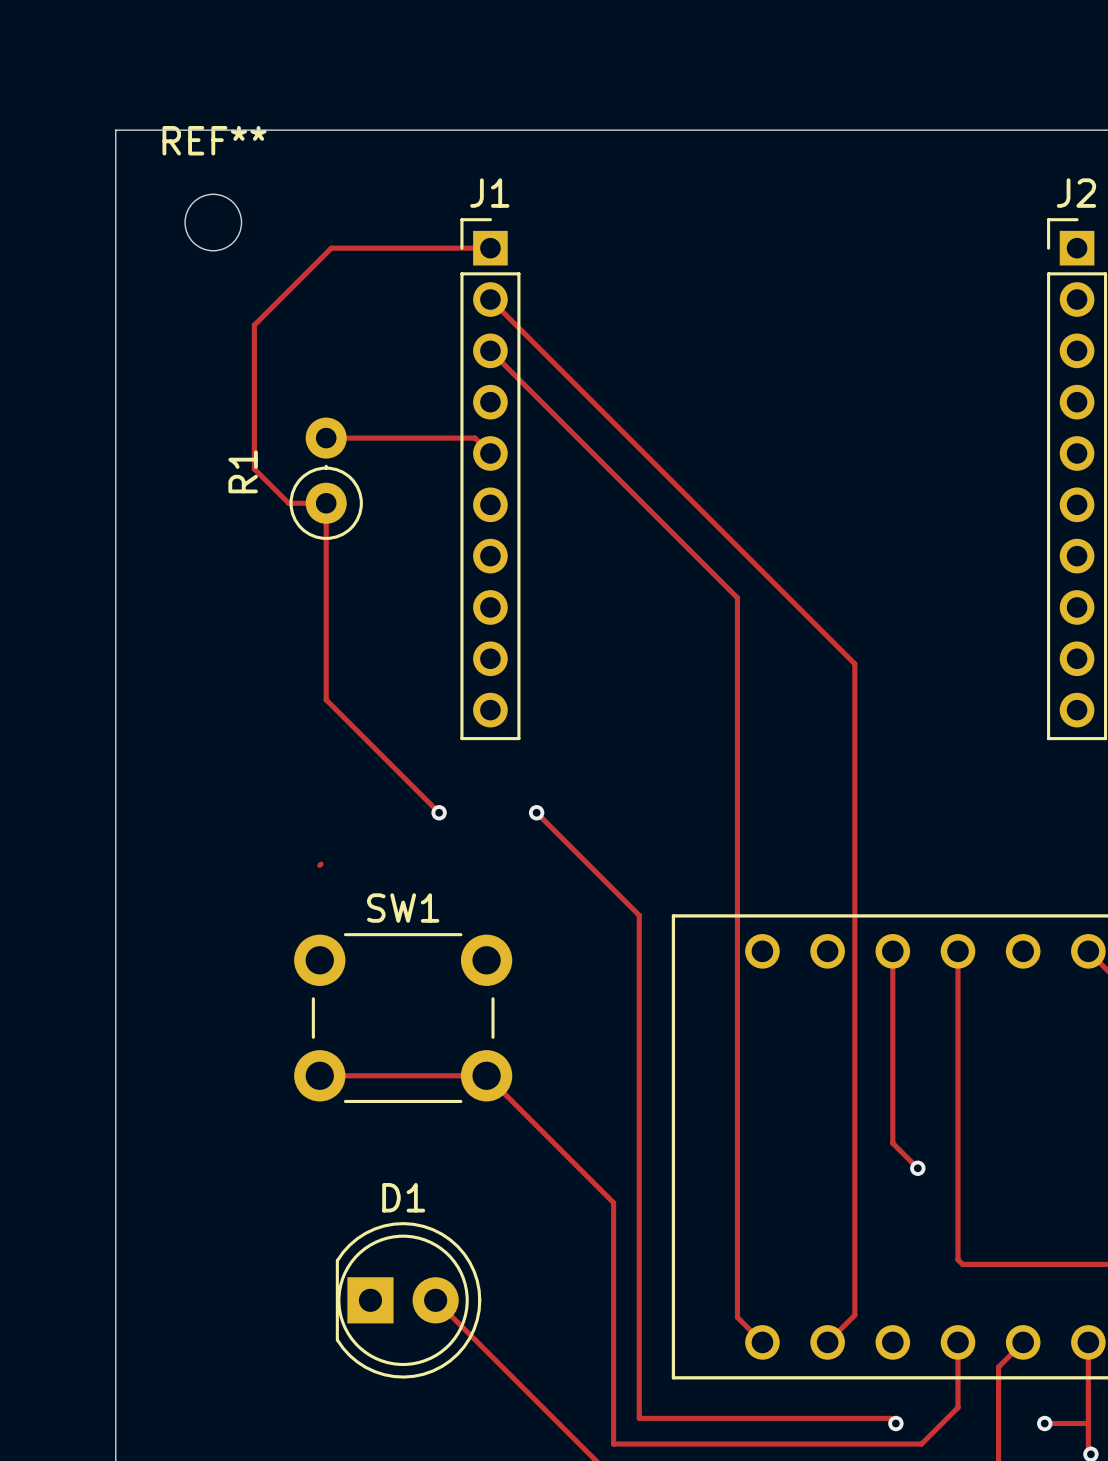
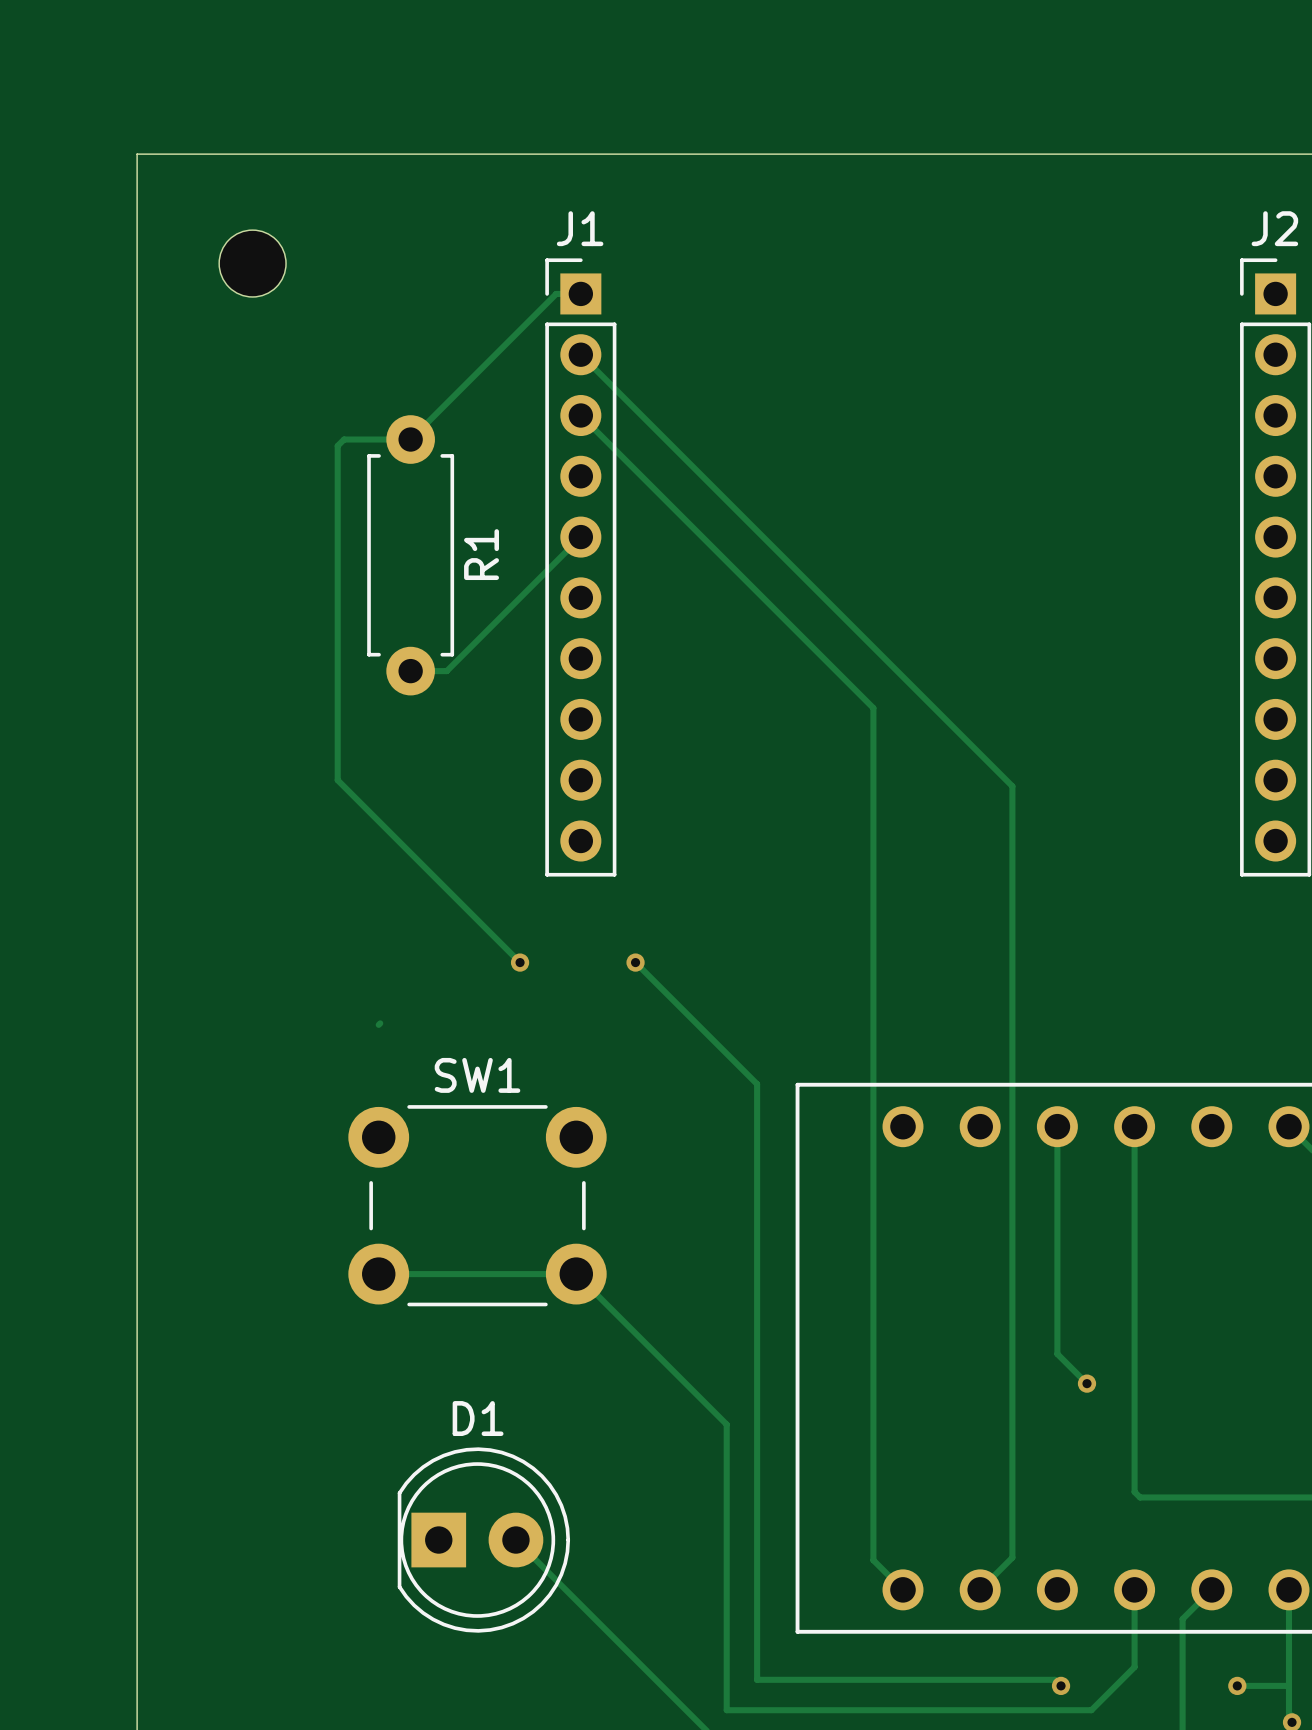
REF** name: REF** (214, 140) -> none
track: (469, 248) (331, 248) (254, 325) (254, 468) (288, 503) (326, 503) (326, 699) -> (556, 293) (410, 439) (344, 439) (337, 445) (337, 780) (386, 828)
R1 footprint: [289, 417, 363, 540] -> [367, 415, 455, 696]
track: (326, 438) (475, 438) (490, 453) -> (410, 671) (446, 671) (580, 537)
R1 name position: R1 (243, 471) -> R1 (481, 554)

